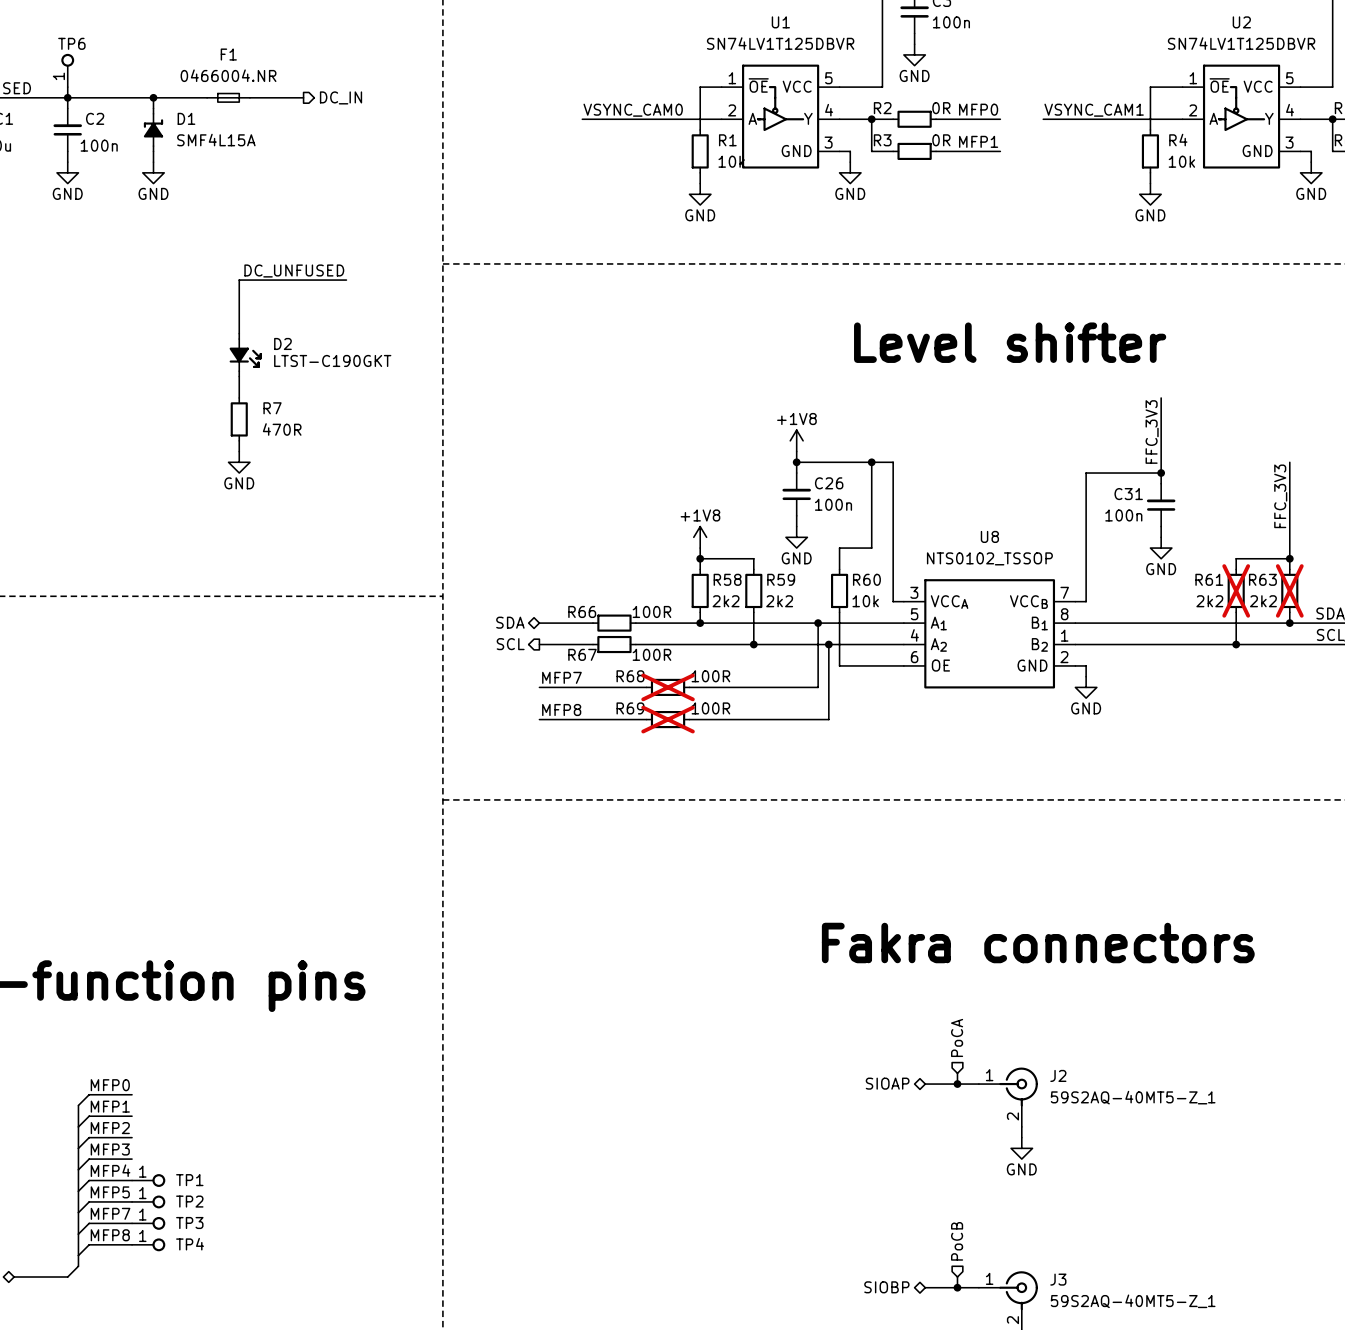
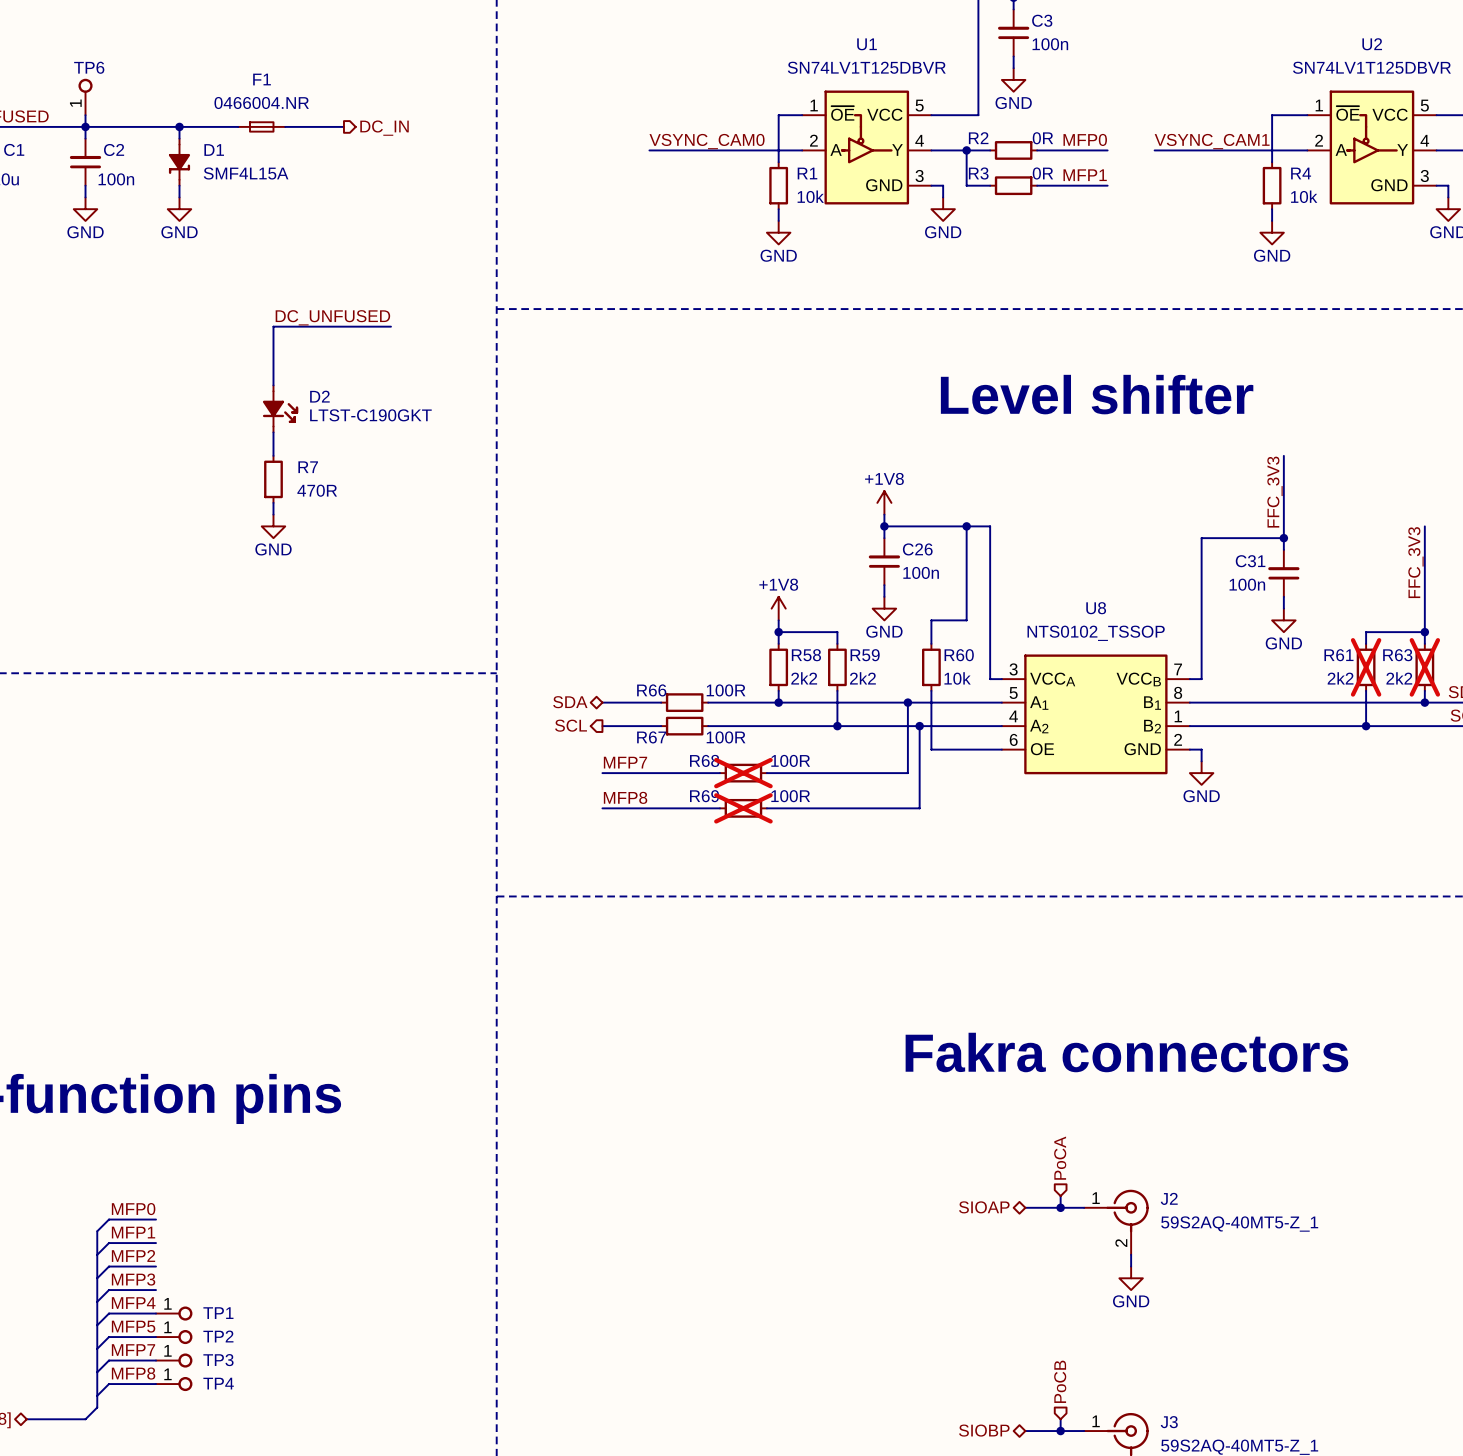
D1 rotation: 0° (153, 129) -> 180° (179, 162)

